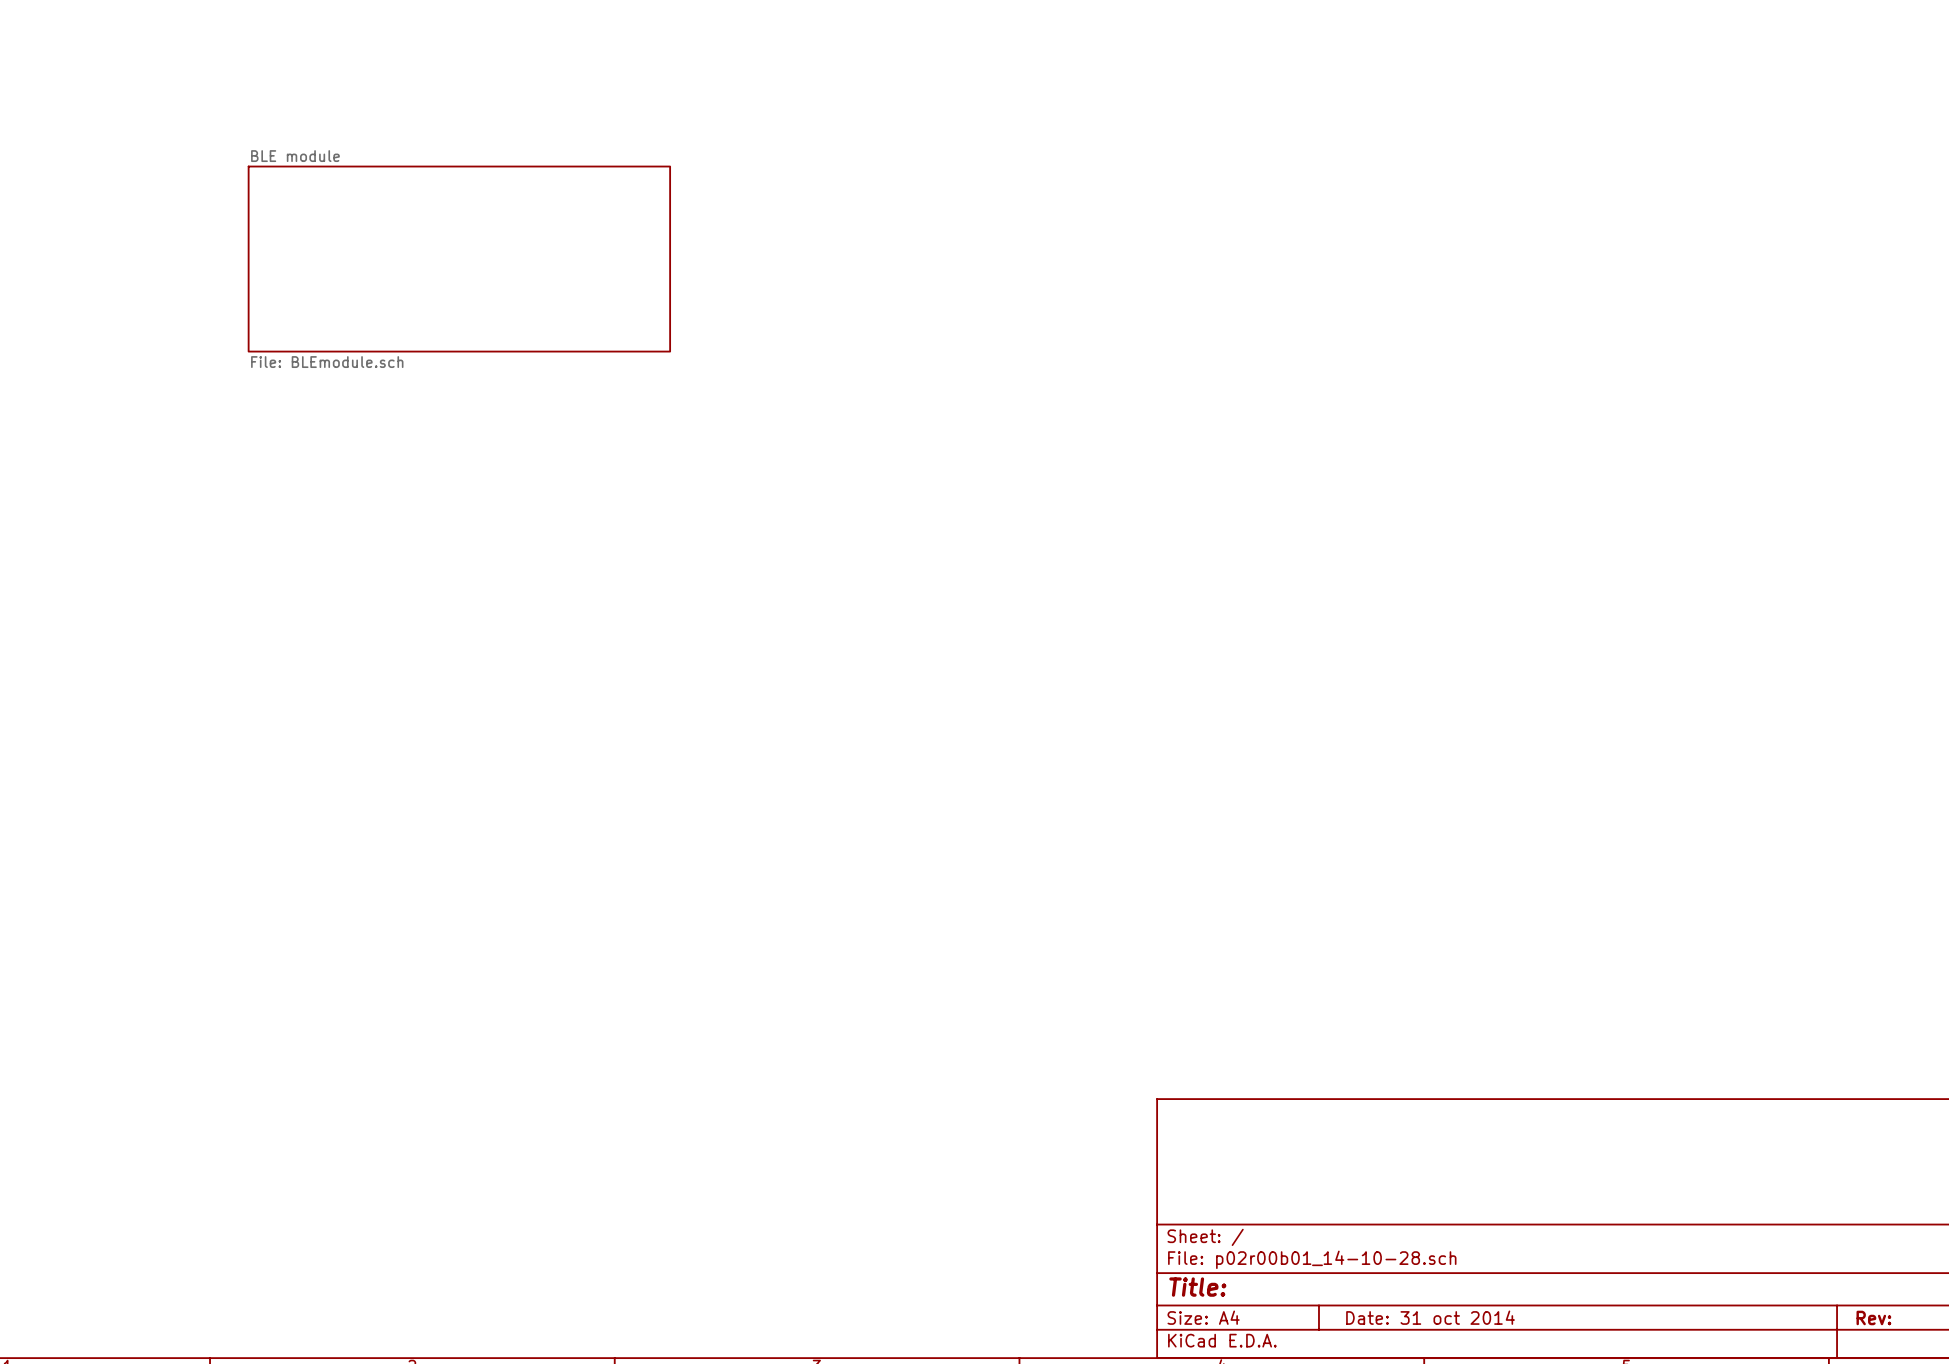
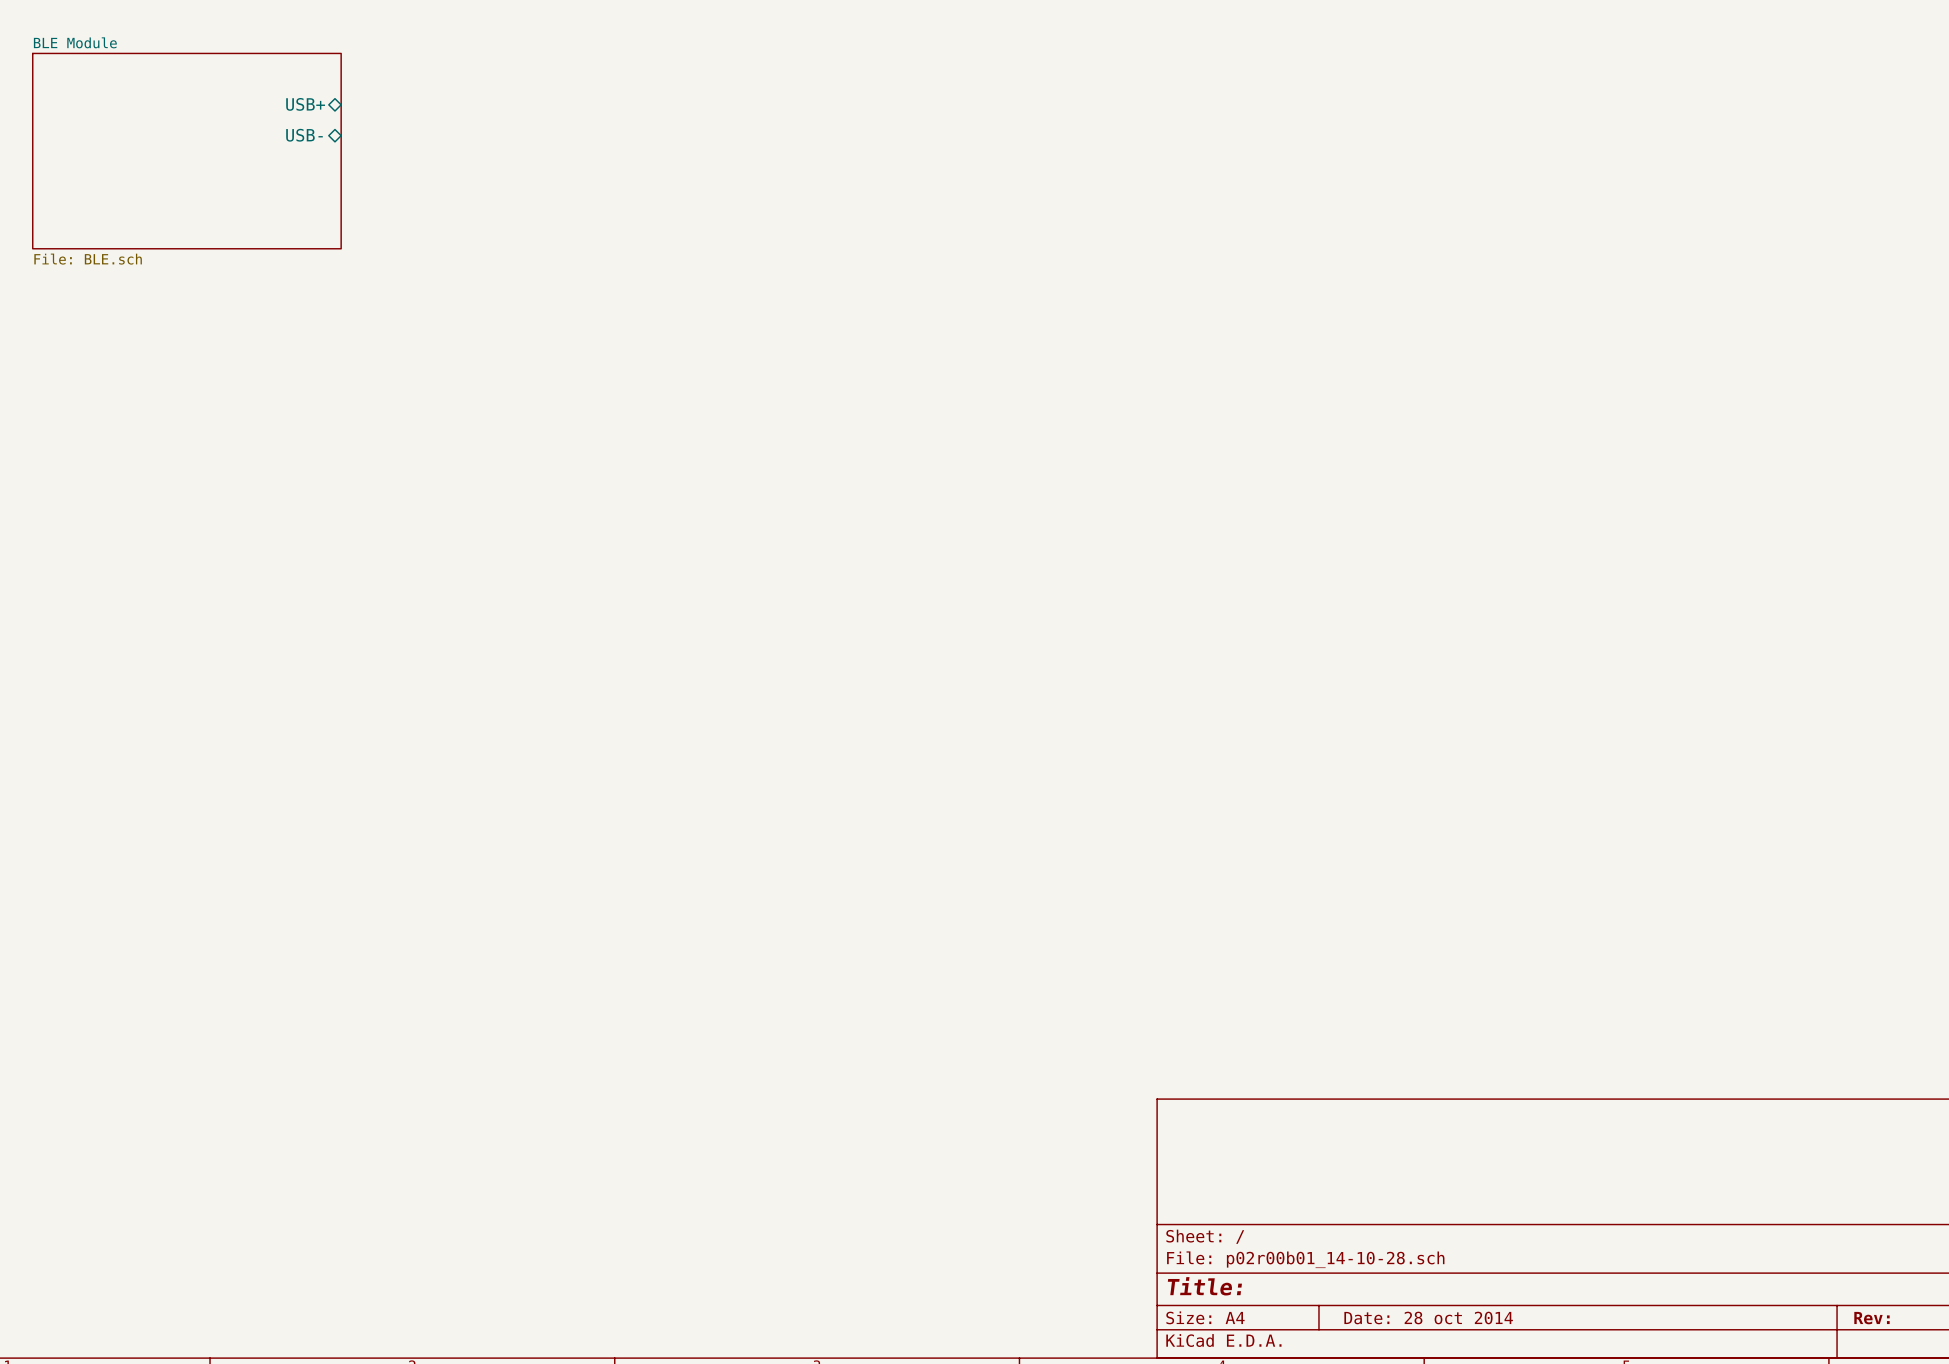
sheet pin: none -> USB+ (305, 104)
sheet pin: none -> USB- (304, 135)
sheet BLE Module: none -> File: BLE.sch (186, 151)
sheet BLE module: File: BLEmodule.sch (459, 259) -> none
title block: Date: 31 oct 2014 (1430, 1317) -> Date: 28 oct 2014 (1428, 1317)

